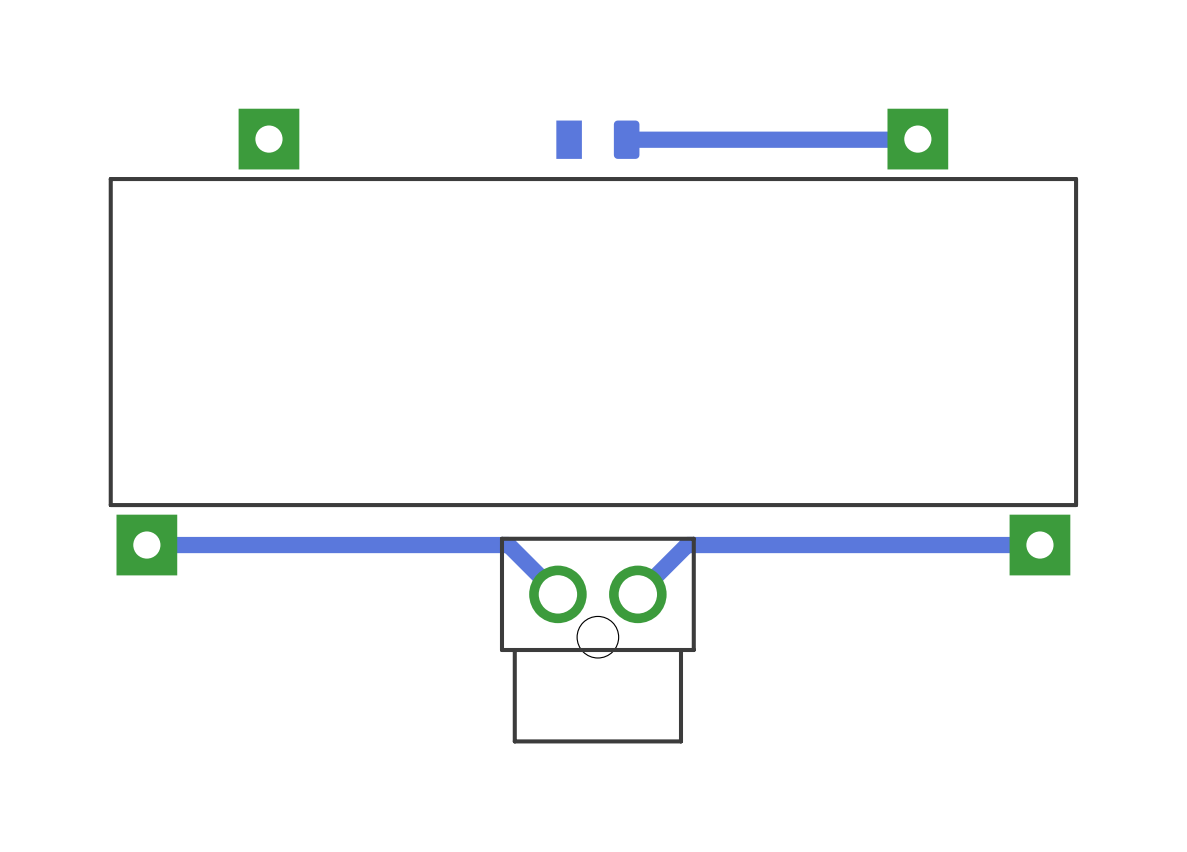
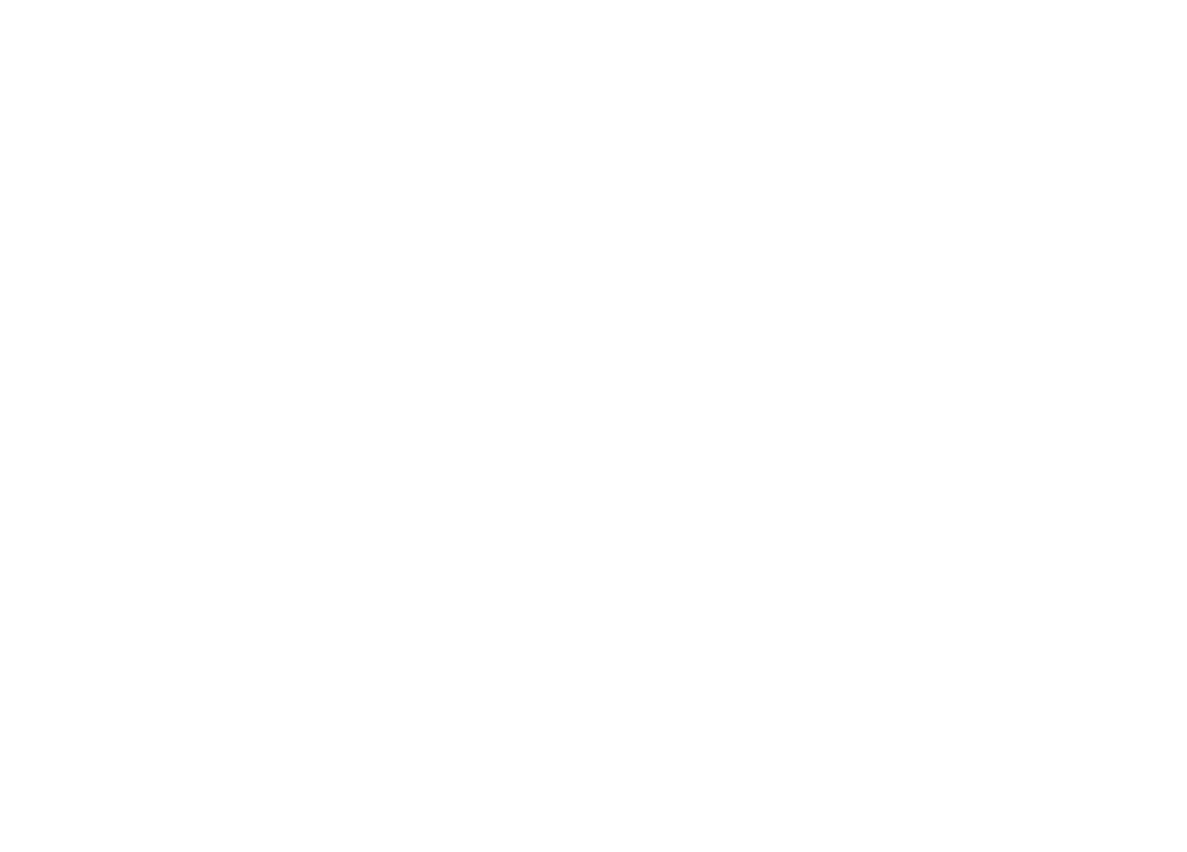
bottom track: (925, 131) (917, 139) (626, 139) -> none
part: (597, 139) -> none
part: (593, 342) -> none
bottom track: (146, 545) (508, 545) (557, 594) -> none
bottom track: (1039, 545) (687, 545) (637, 594) -> none
part: (597, 640) -> none

